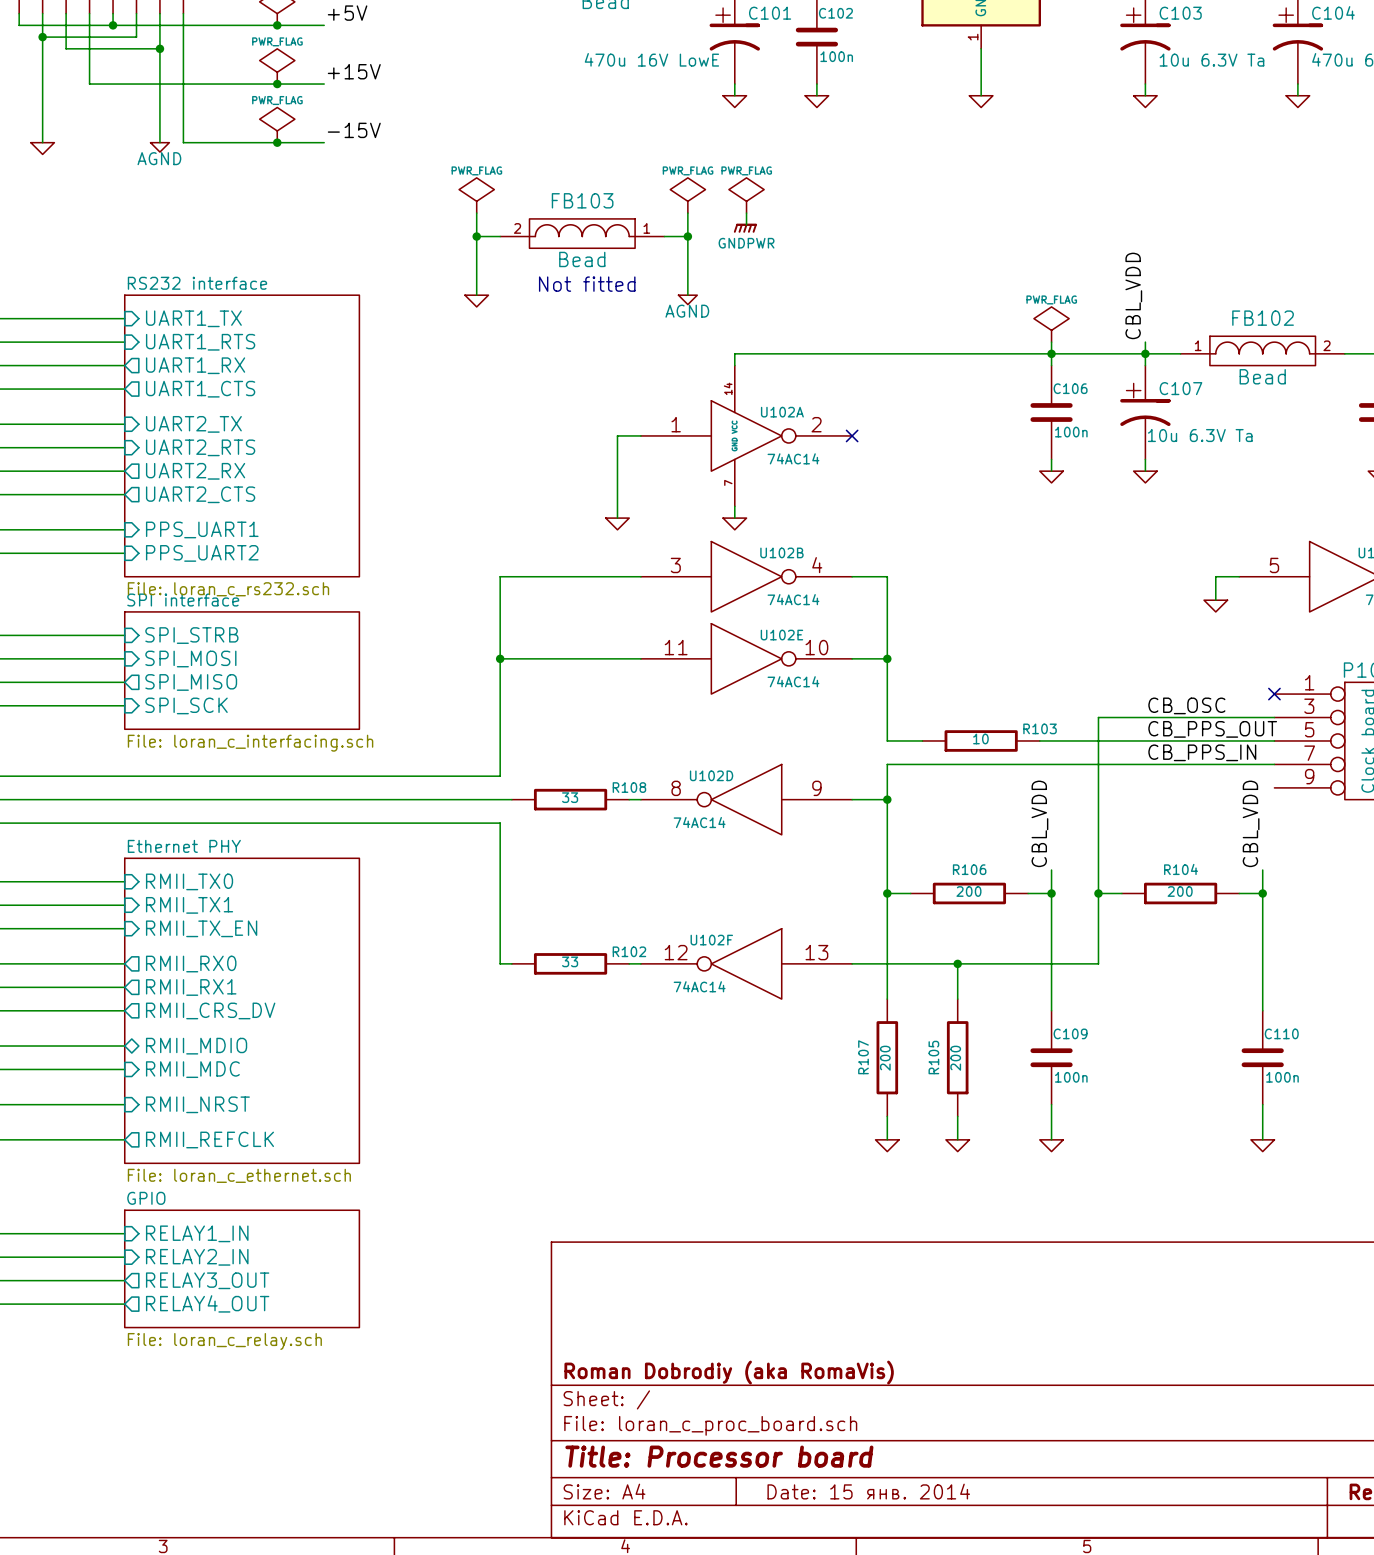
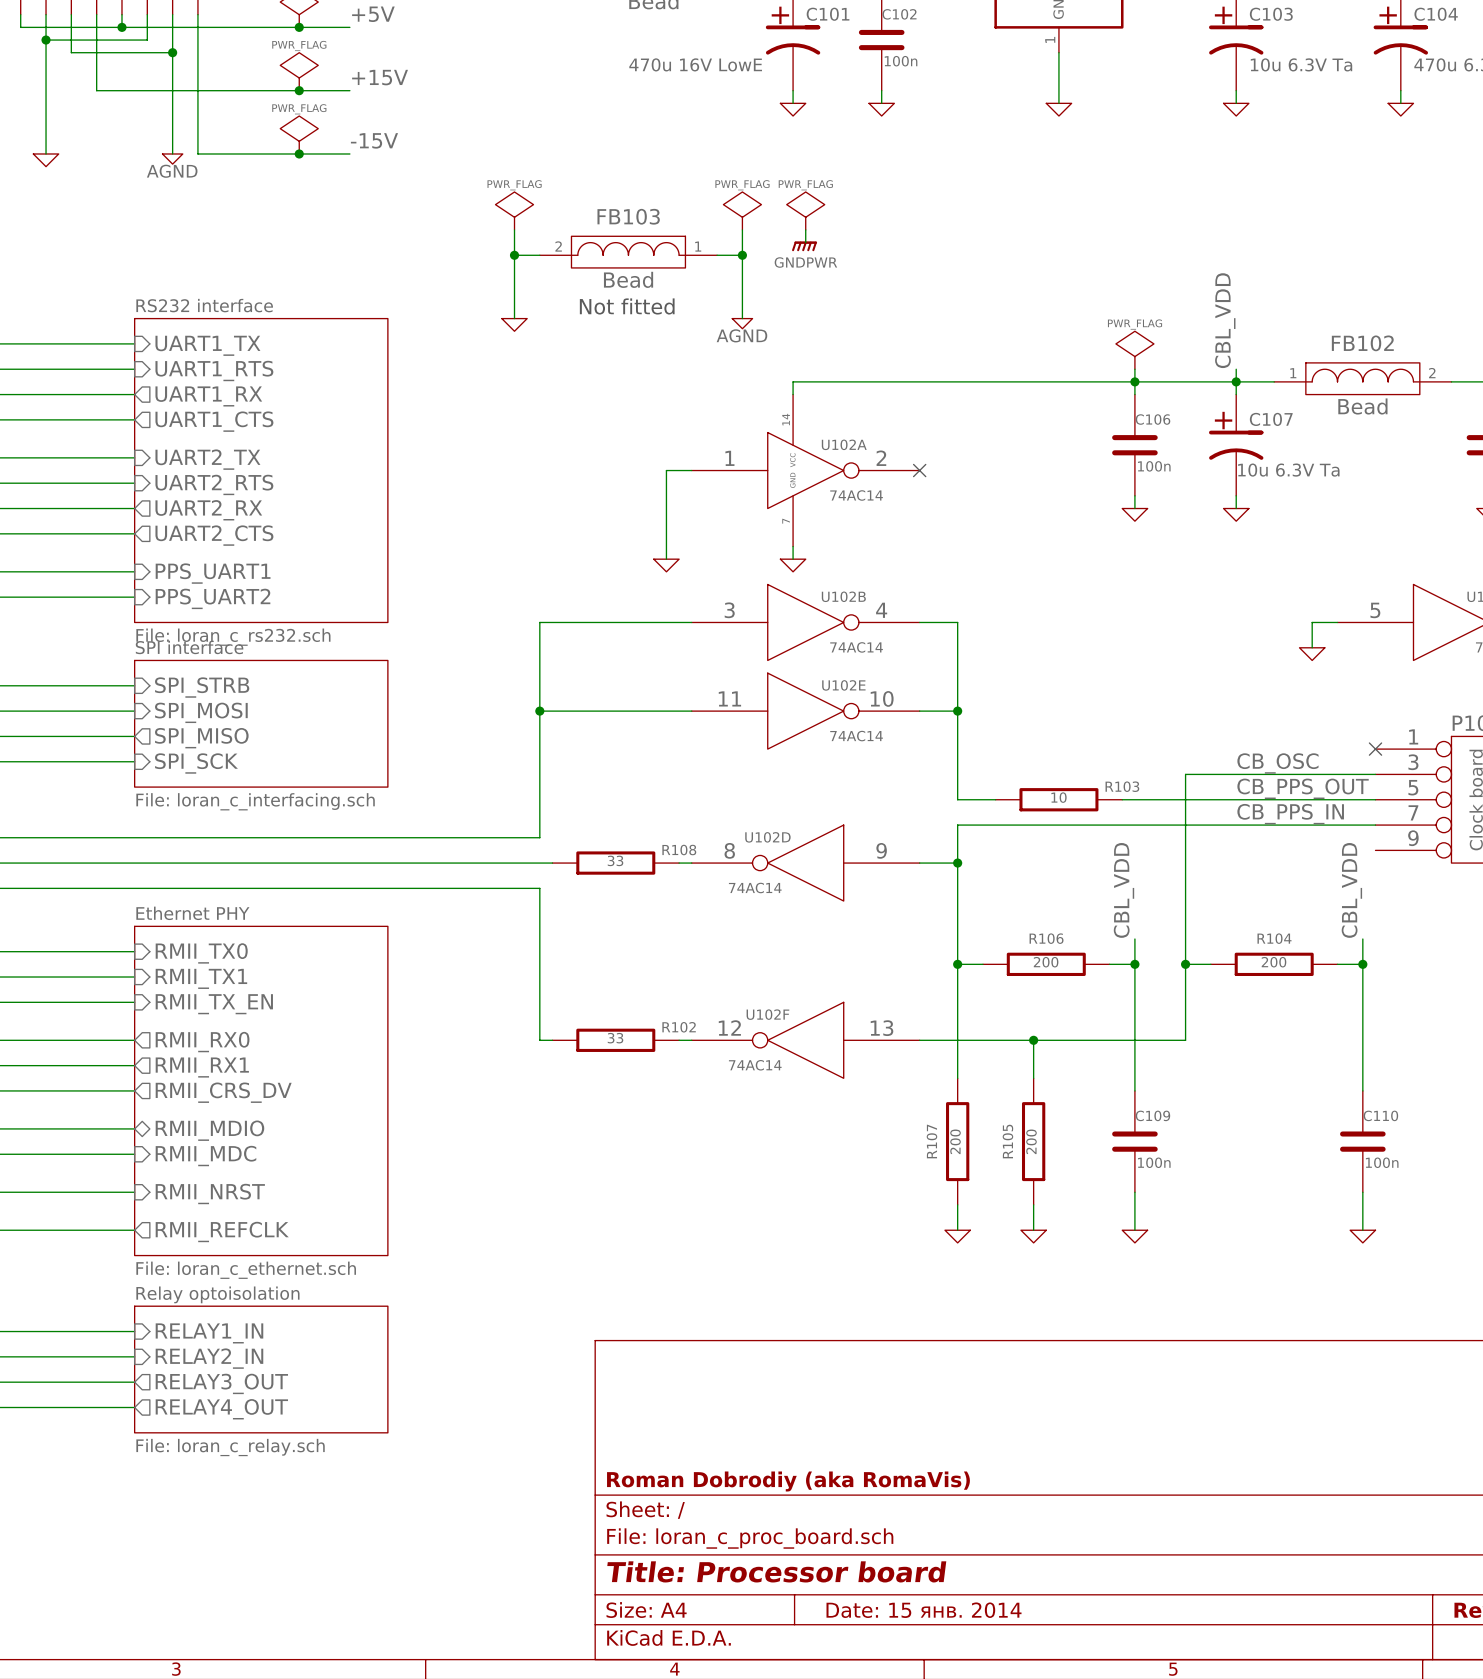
sheet GPIO name: GPIO (146, 1198) -> Relay optoisolation (217, 1294)

